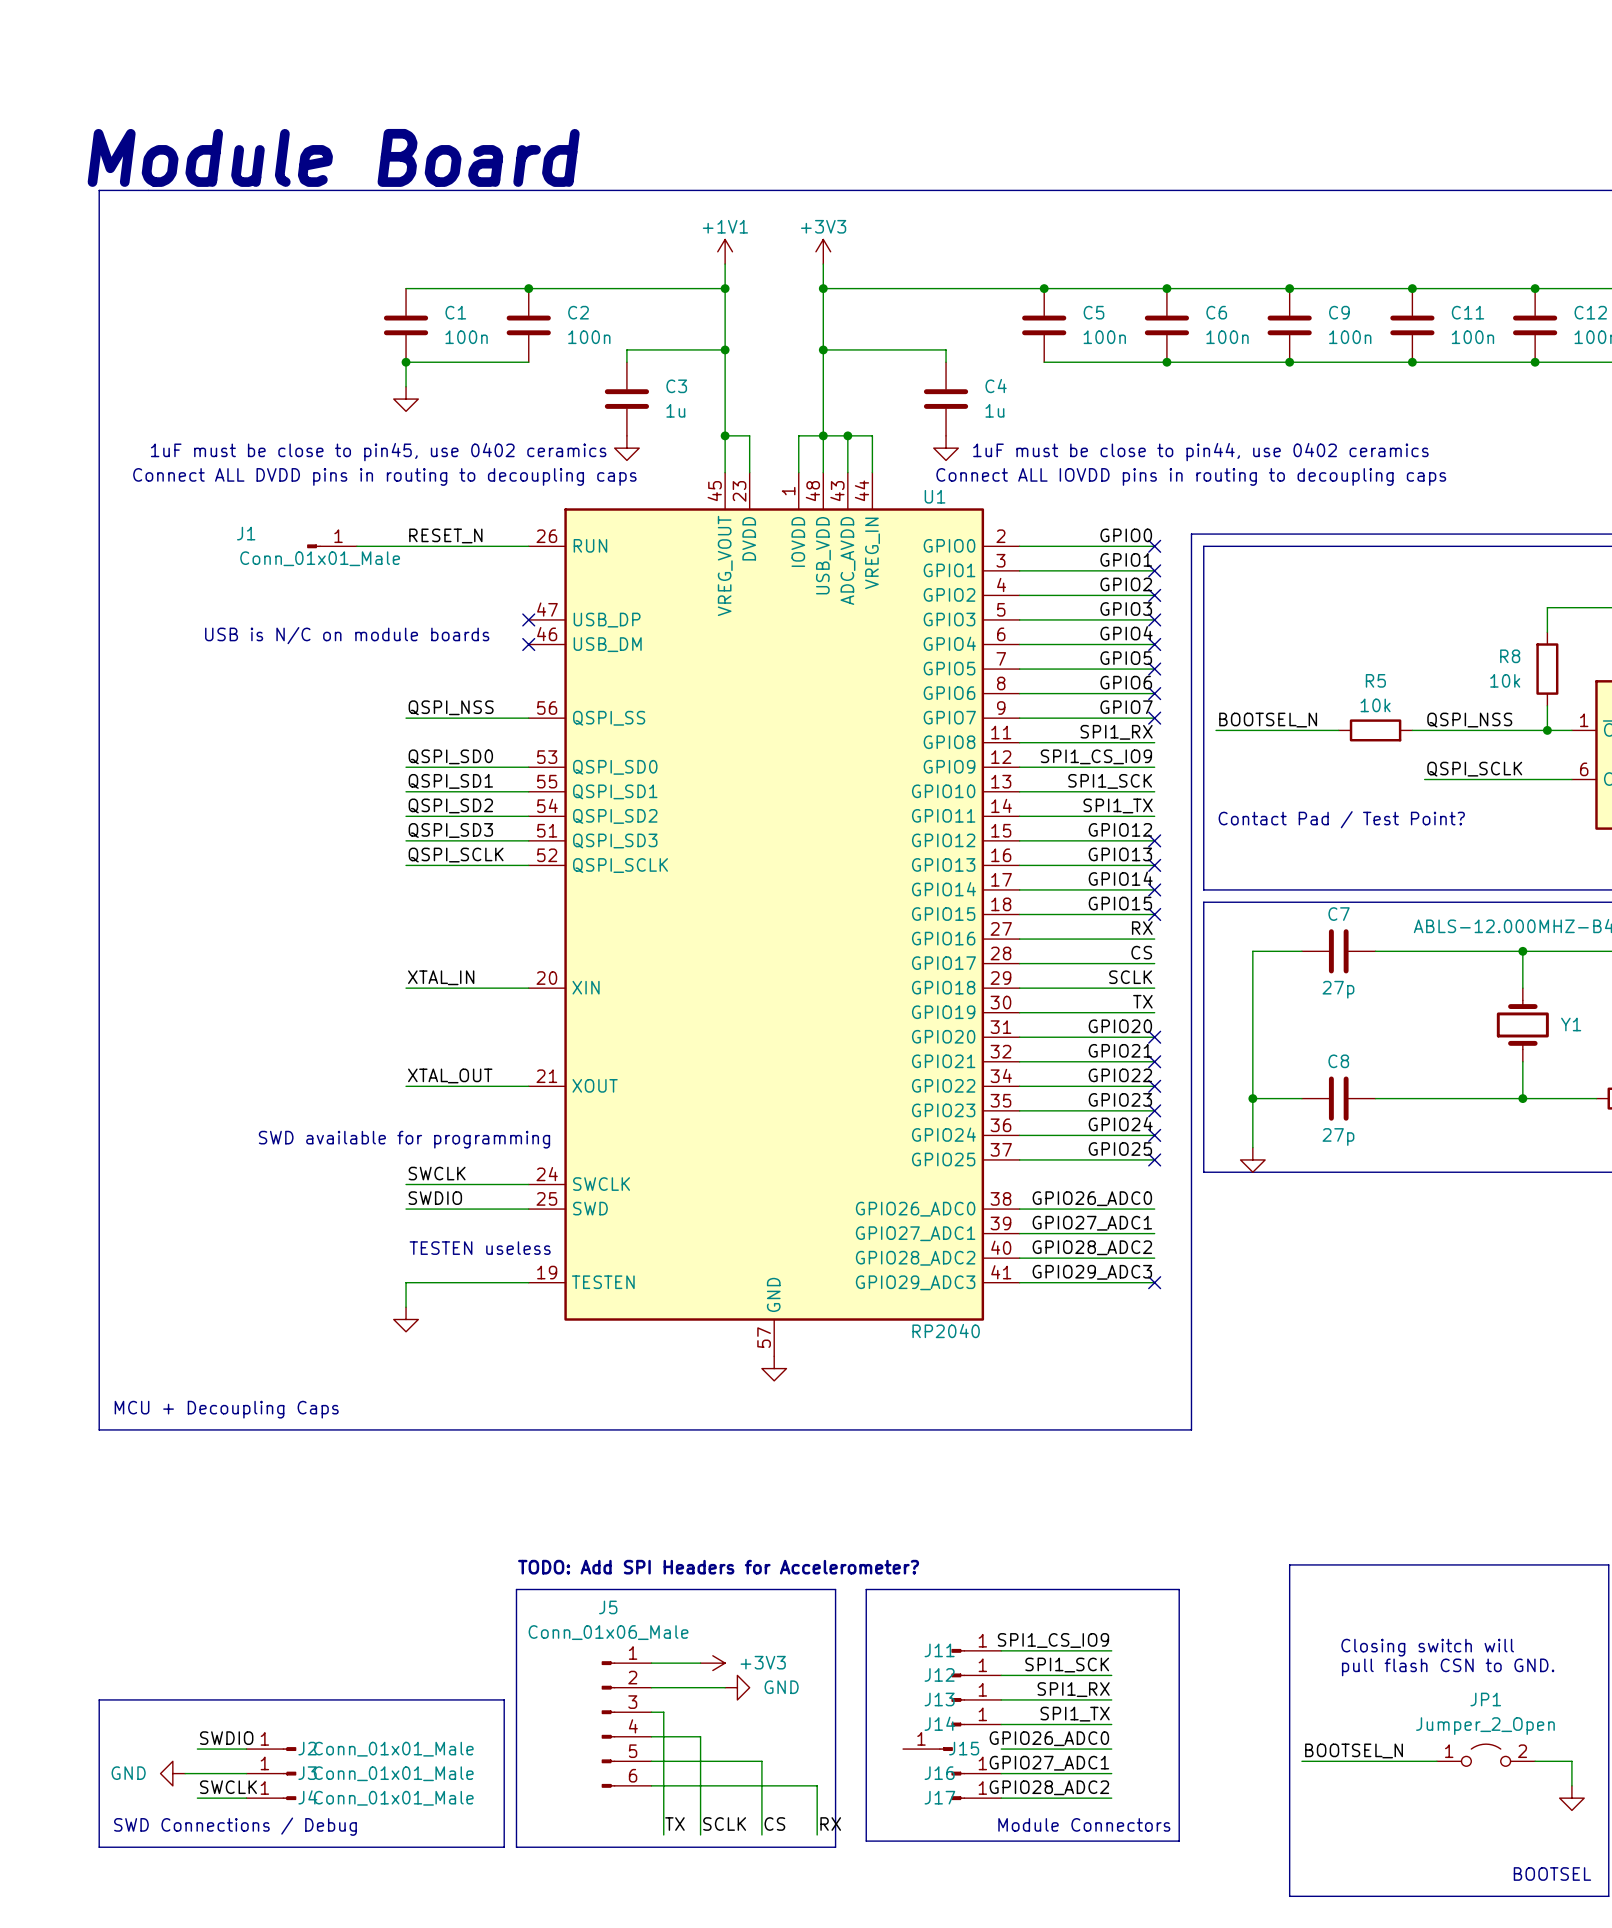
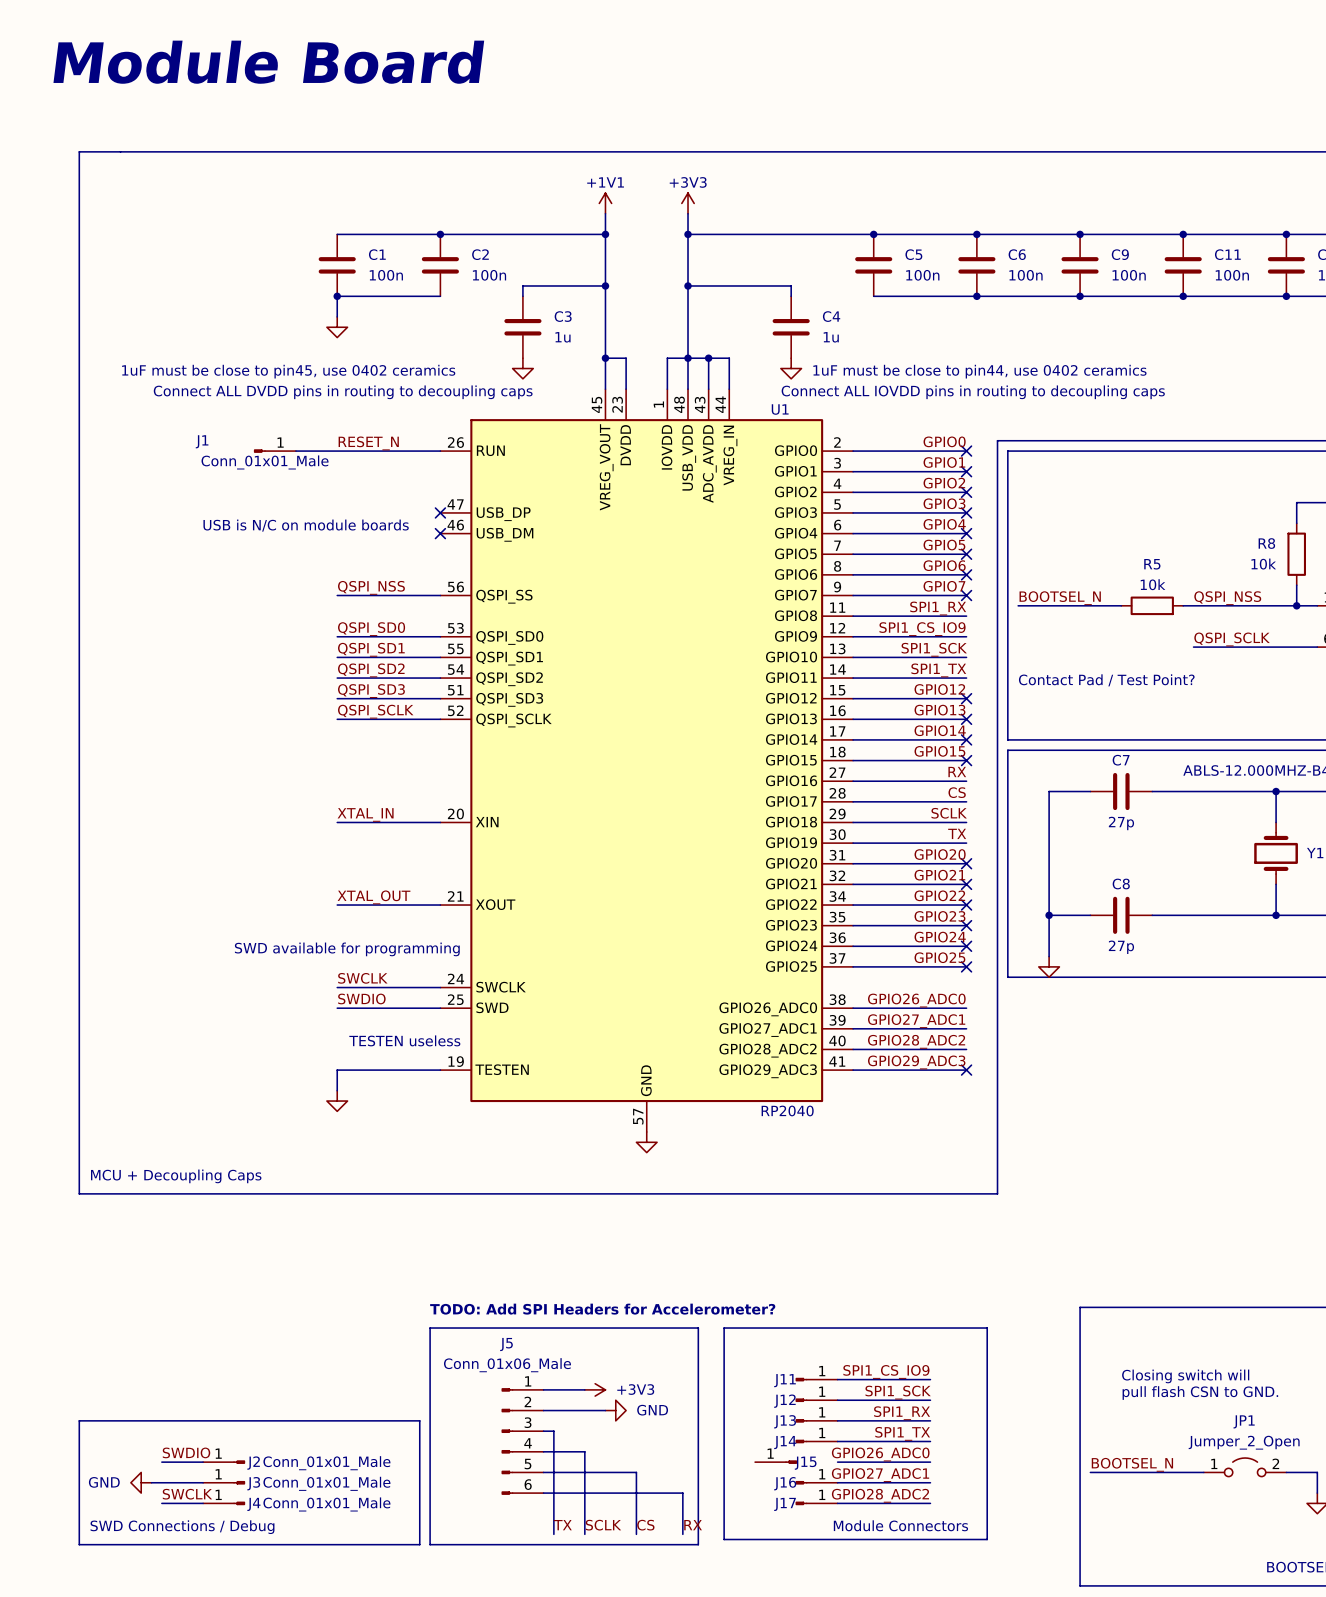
text position: Module Board (333, 157) -> Module Board (268, 62)

